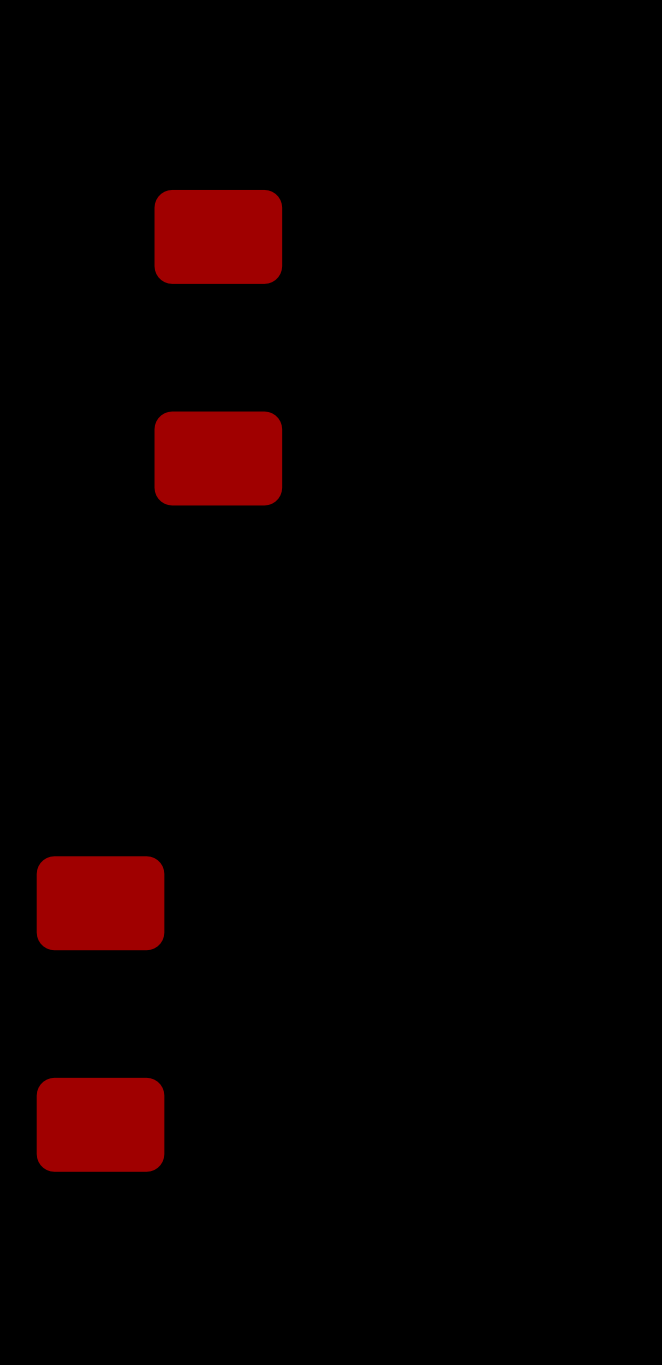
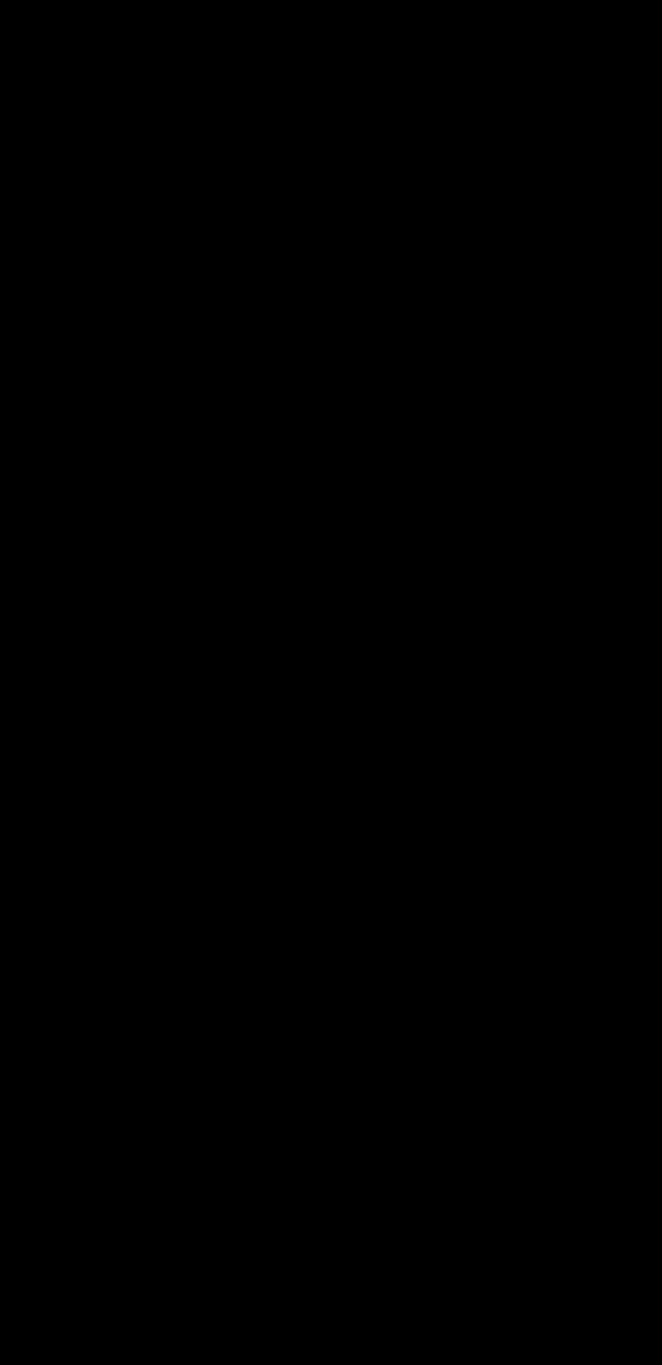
part: (218, 347) -> none
part: (100, 1014) -> none

